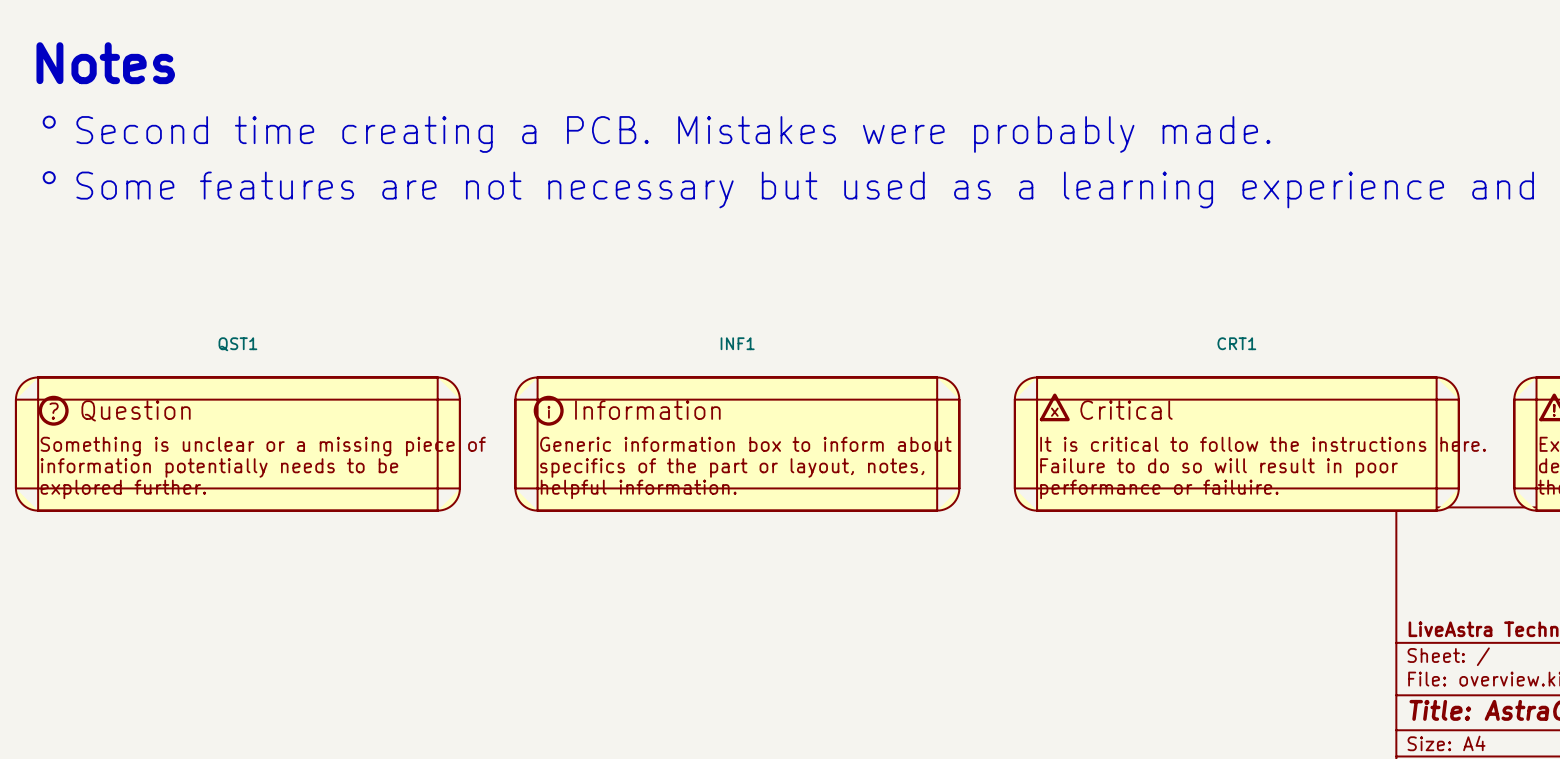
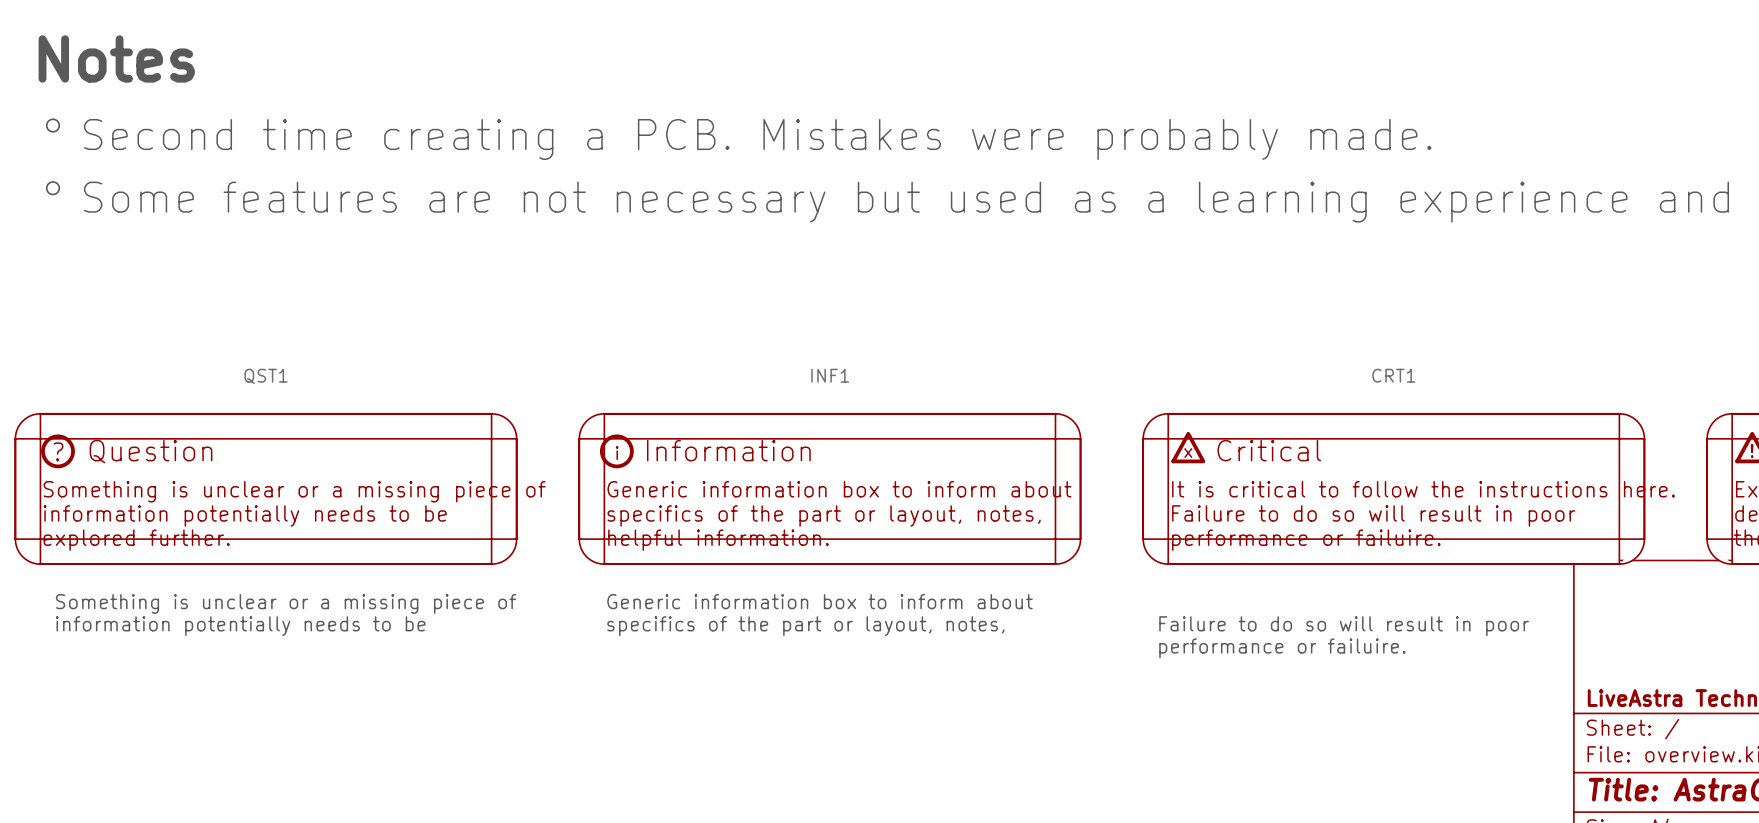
text: none -> Generic information box to inform about (819, 601)
text: none -> Something is unclear or a missing piece of (286, 603)
text: none -> information potentially needs to be (240, 626)
text: none -> specifics of the part or layout, notes, (805, 626)
text: none -> Failure to do so will result in poor (1344, 626)
text: none -> performance or failuire. (1282, 648)

